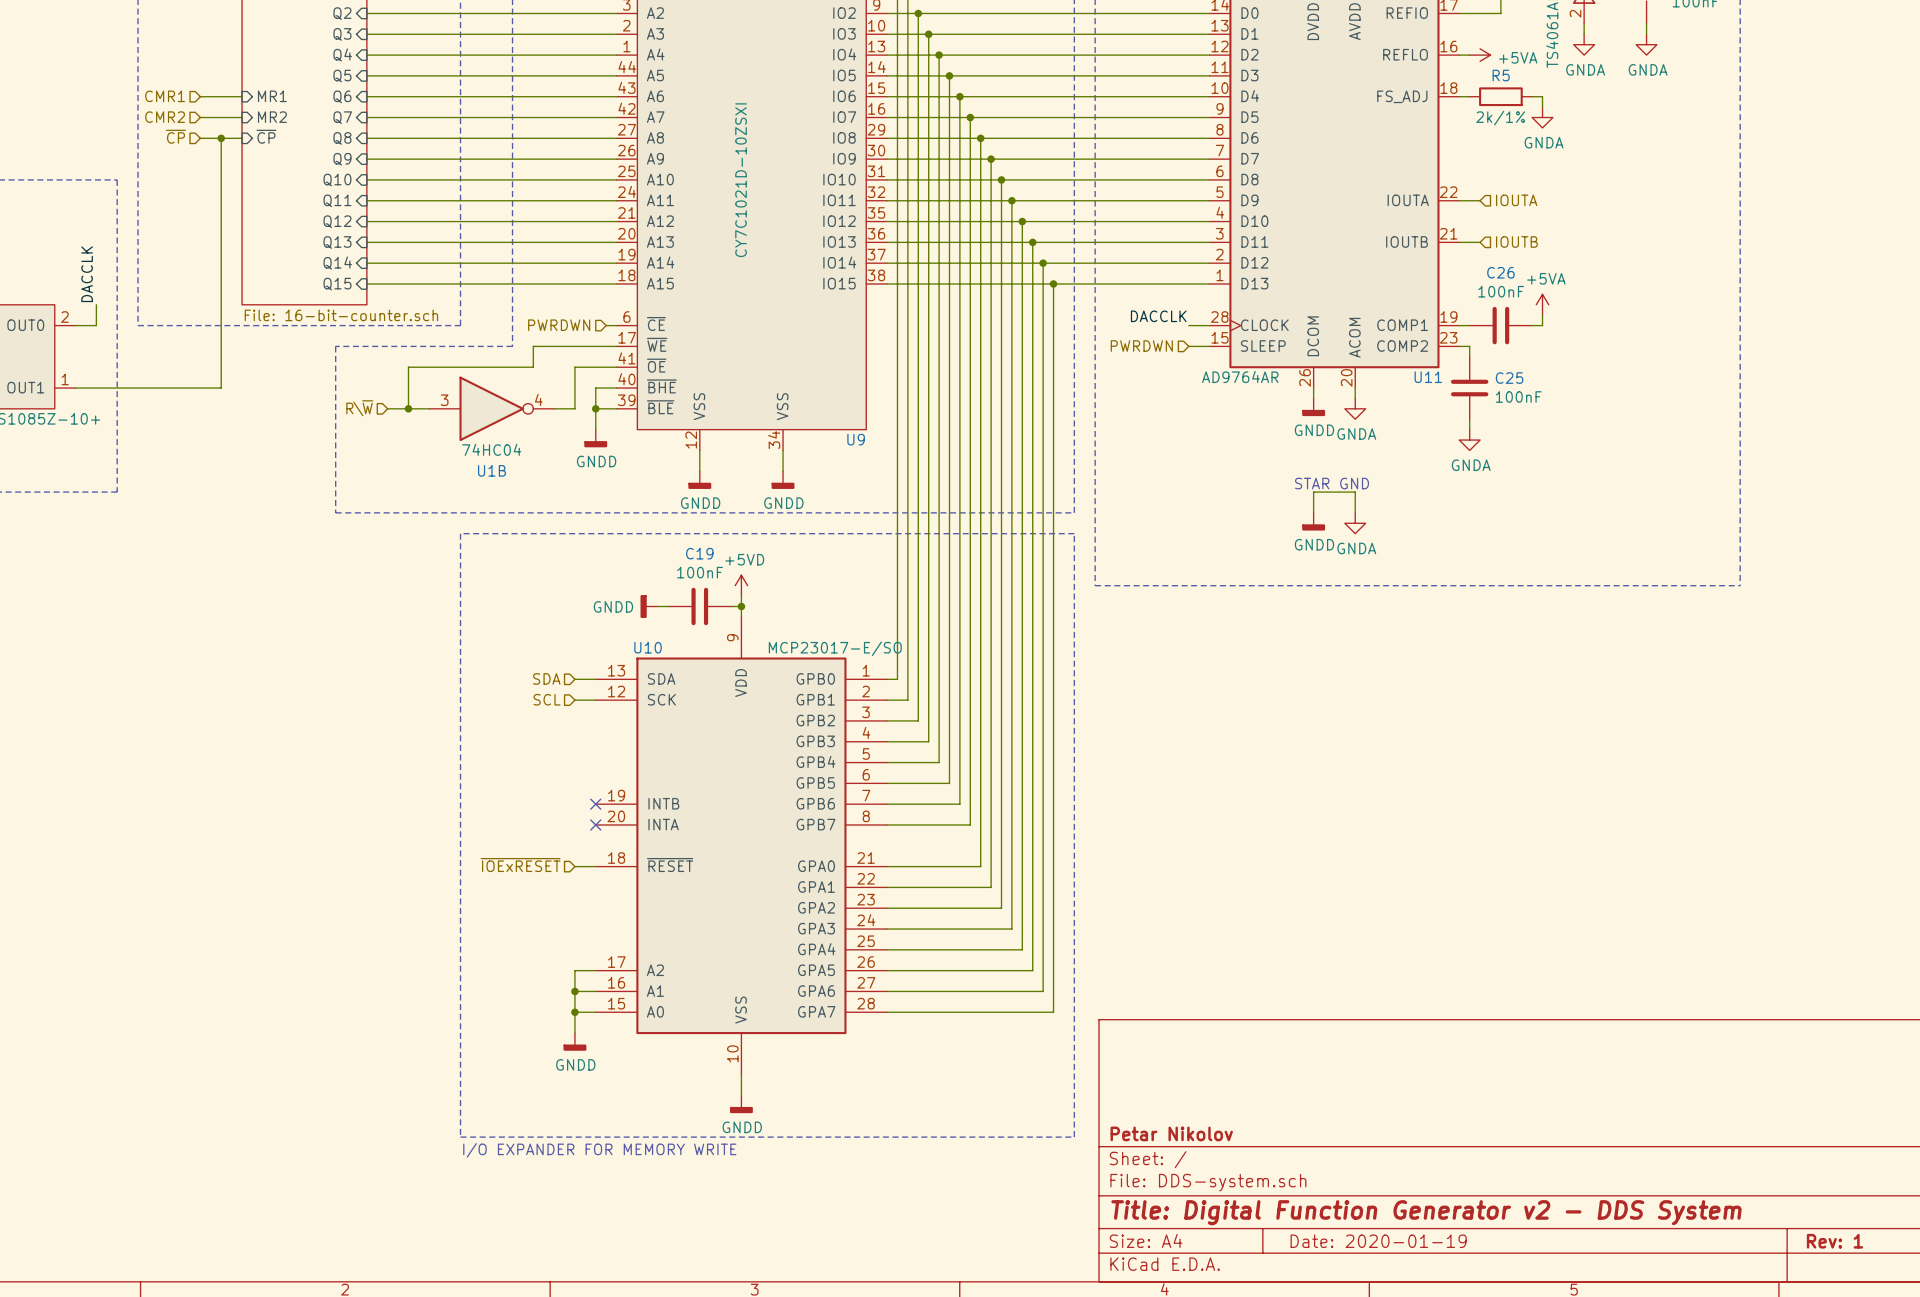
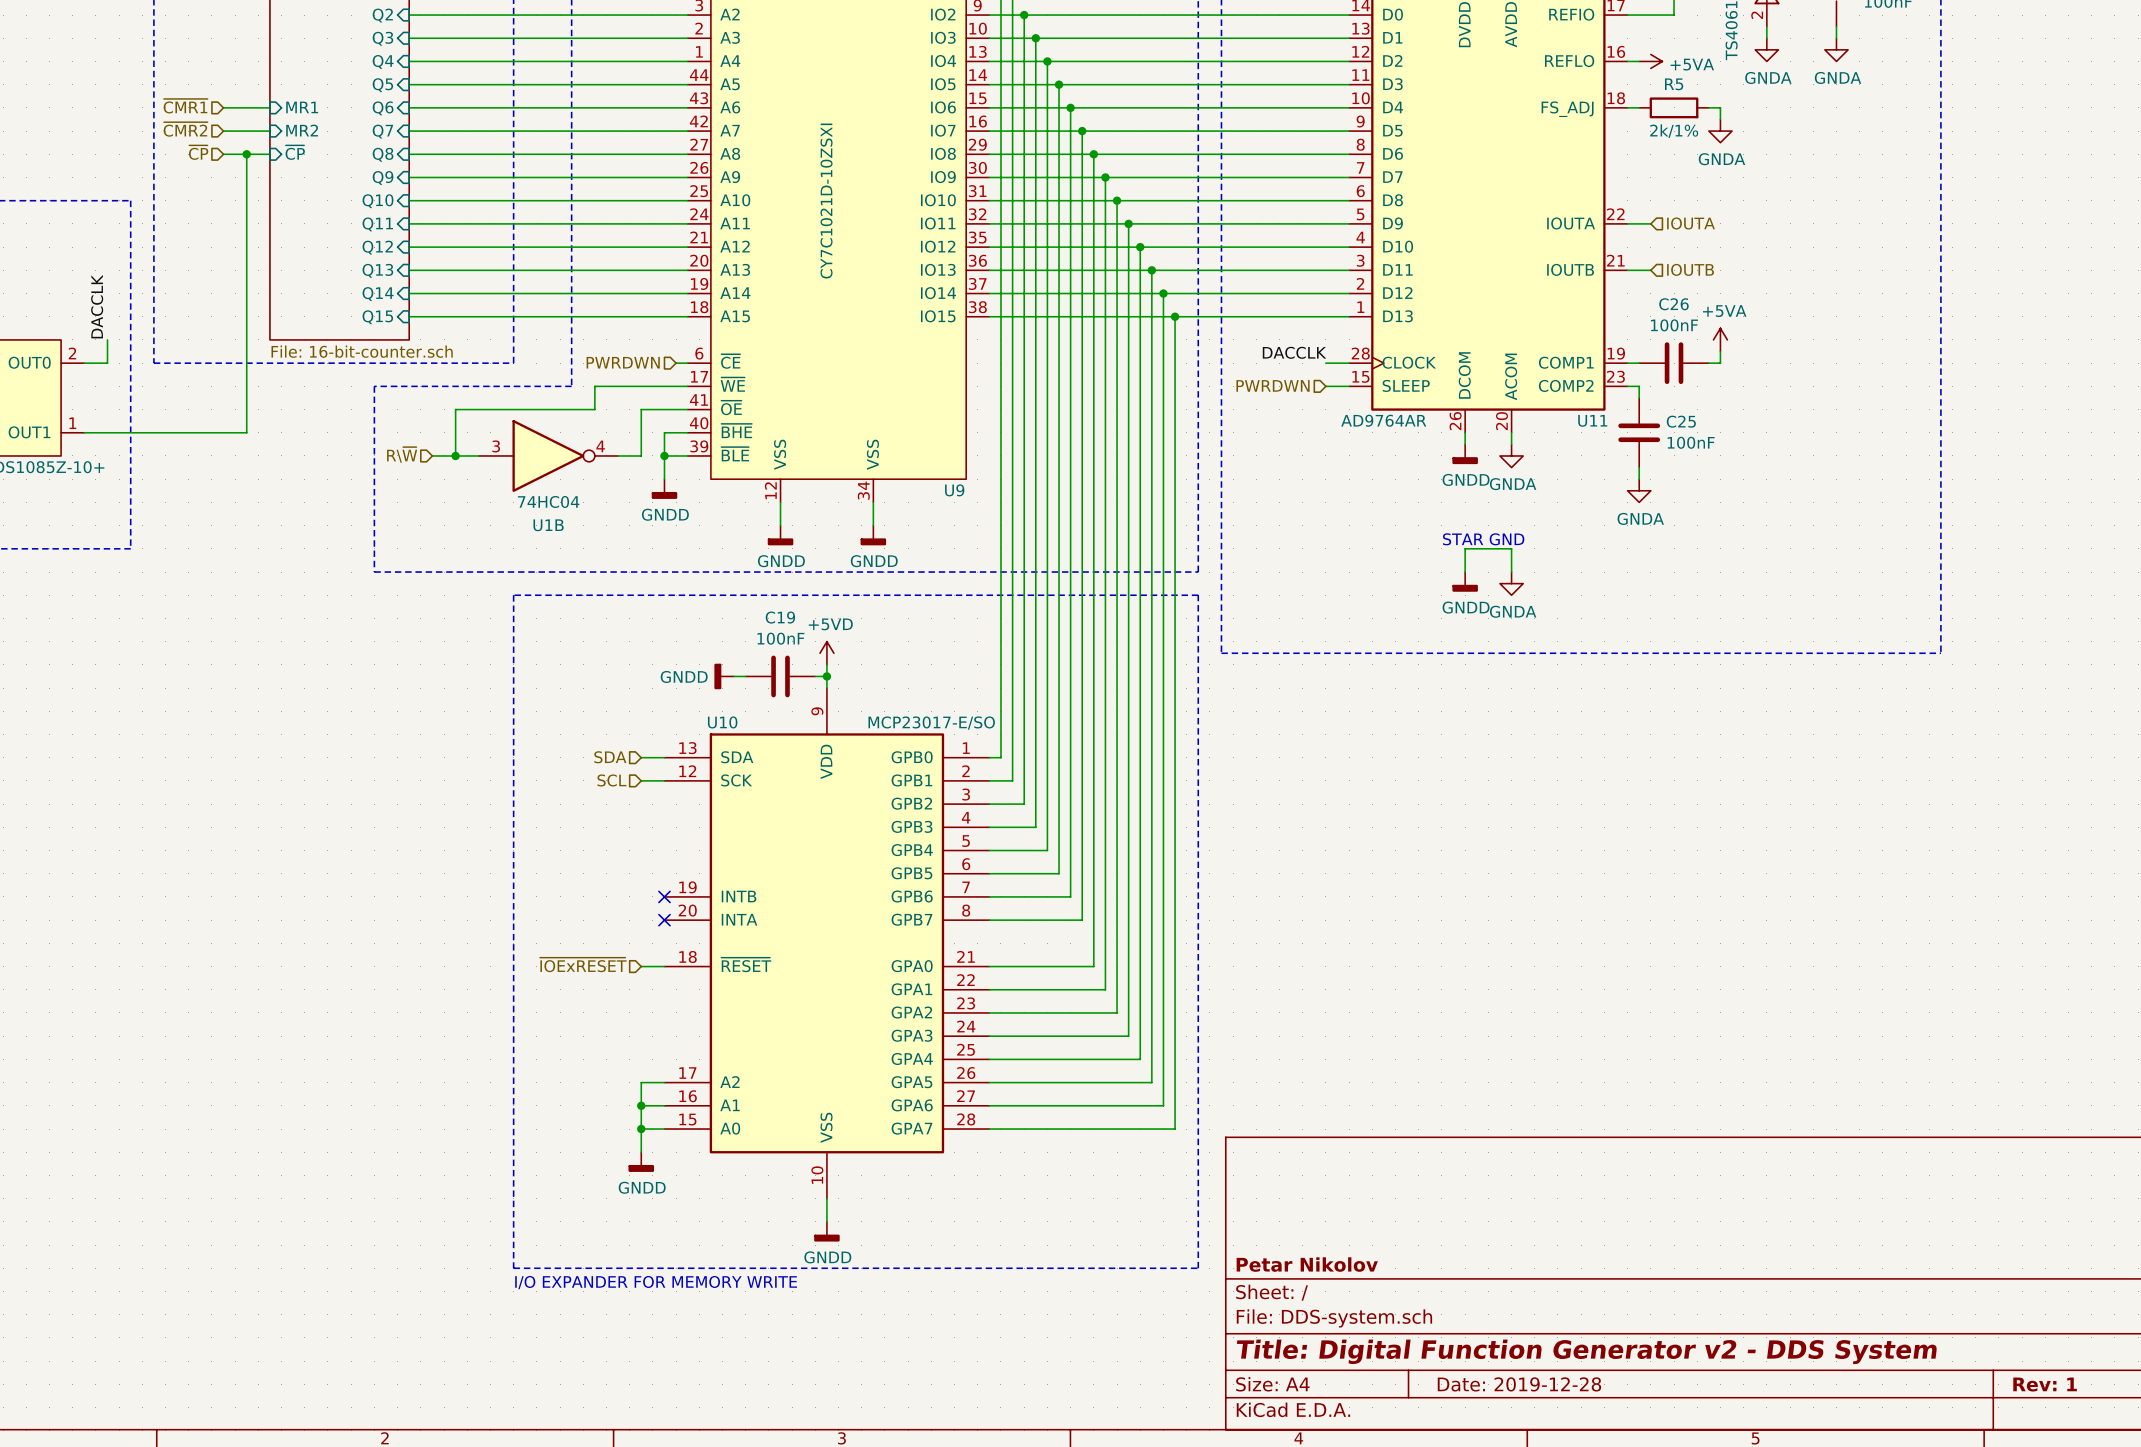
hierarchical label: CMR1 (165, 96) -> ~{CMR1} (185, 106)
hierarchical label: CMR2 (165, 117) -> ~{CMR2} (185, 129)
title block: Date: 2020-01-19 (1378, 1241) -> Date: 2019-12-28 (1519, 1384)

